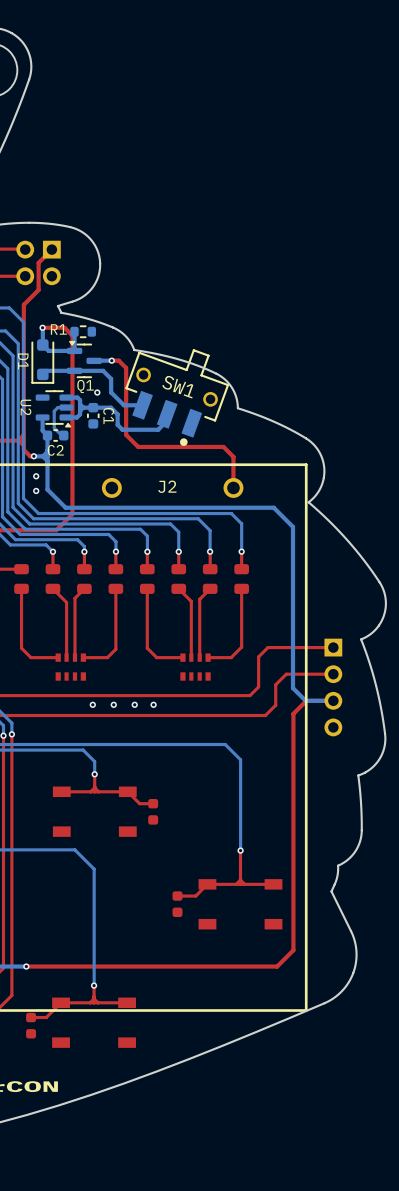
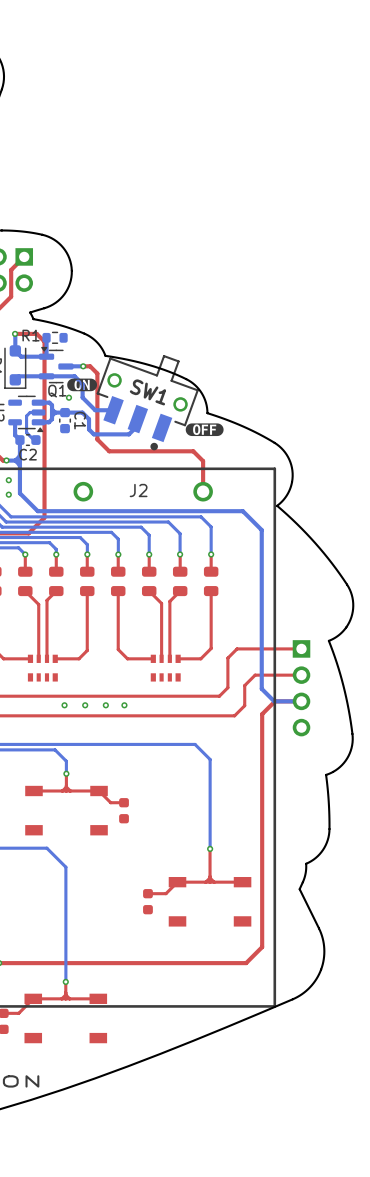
drawing: none -> [67, 378, 98, 392]
drawing: none -> [185, 423, 224, 437]

